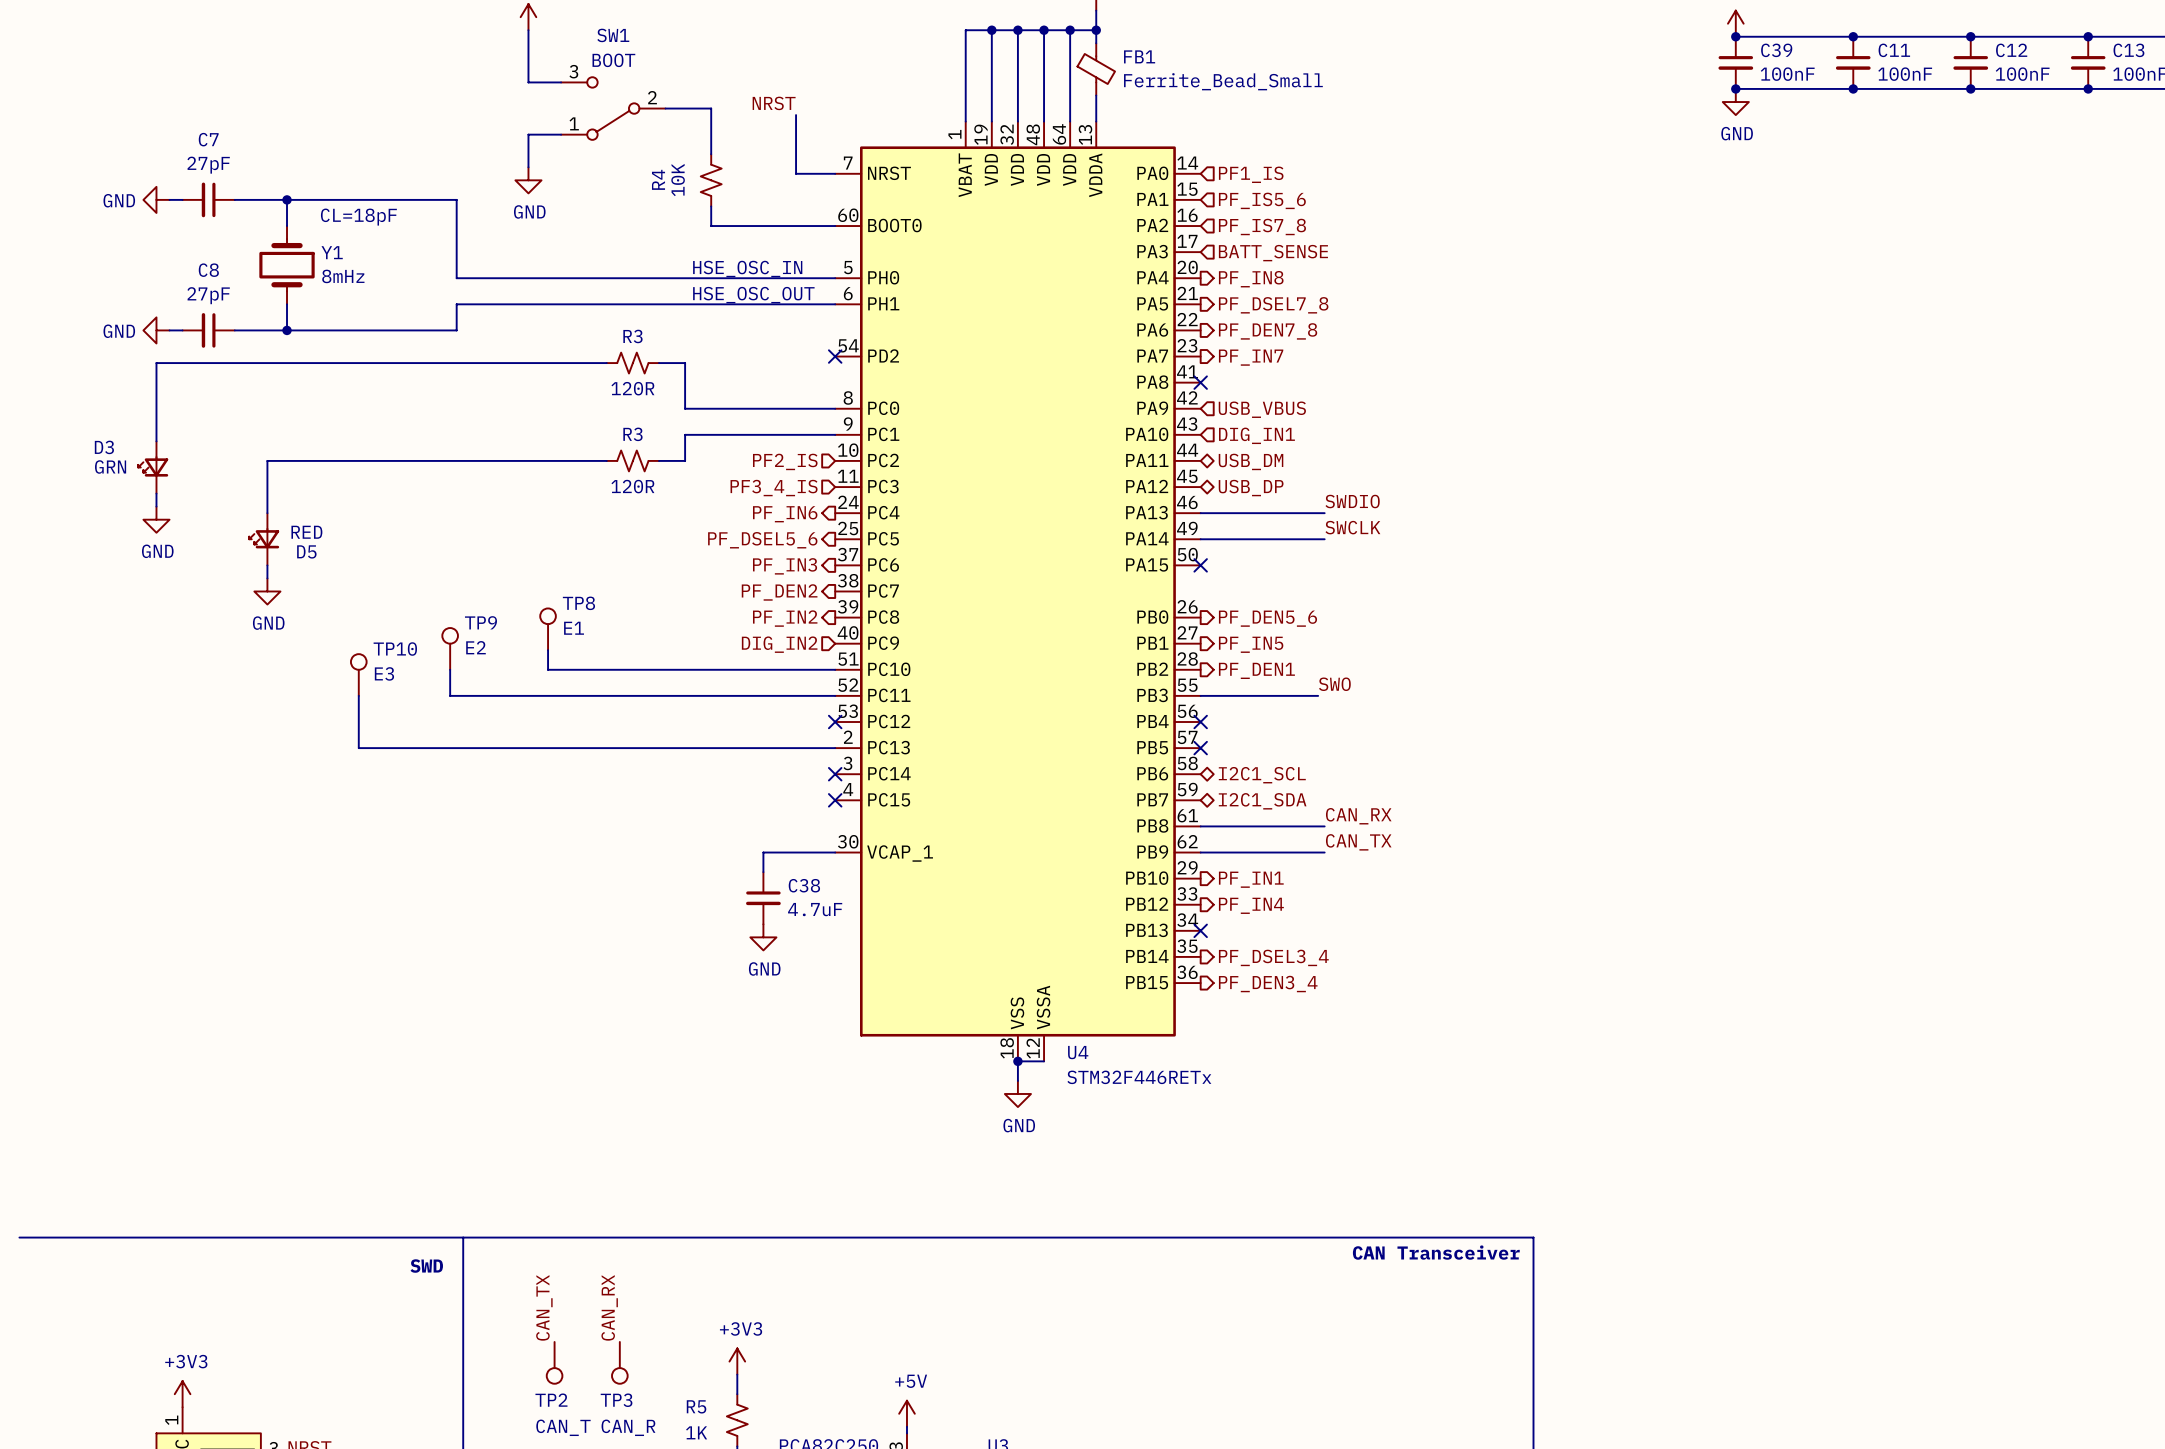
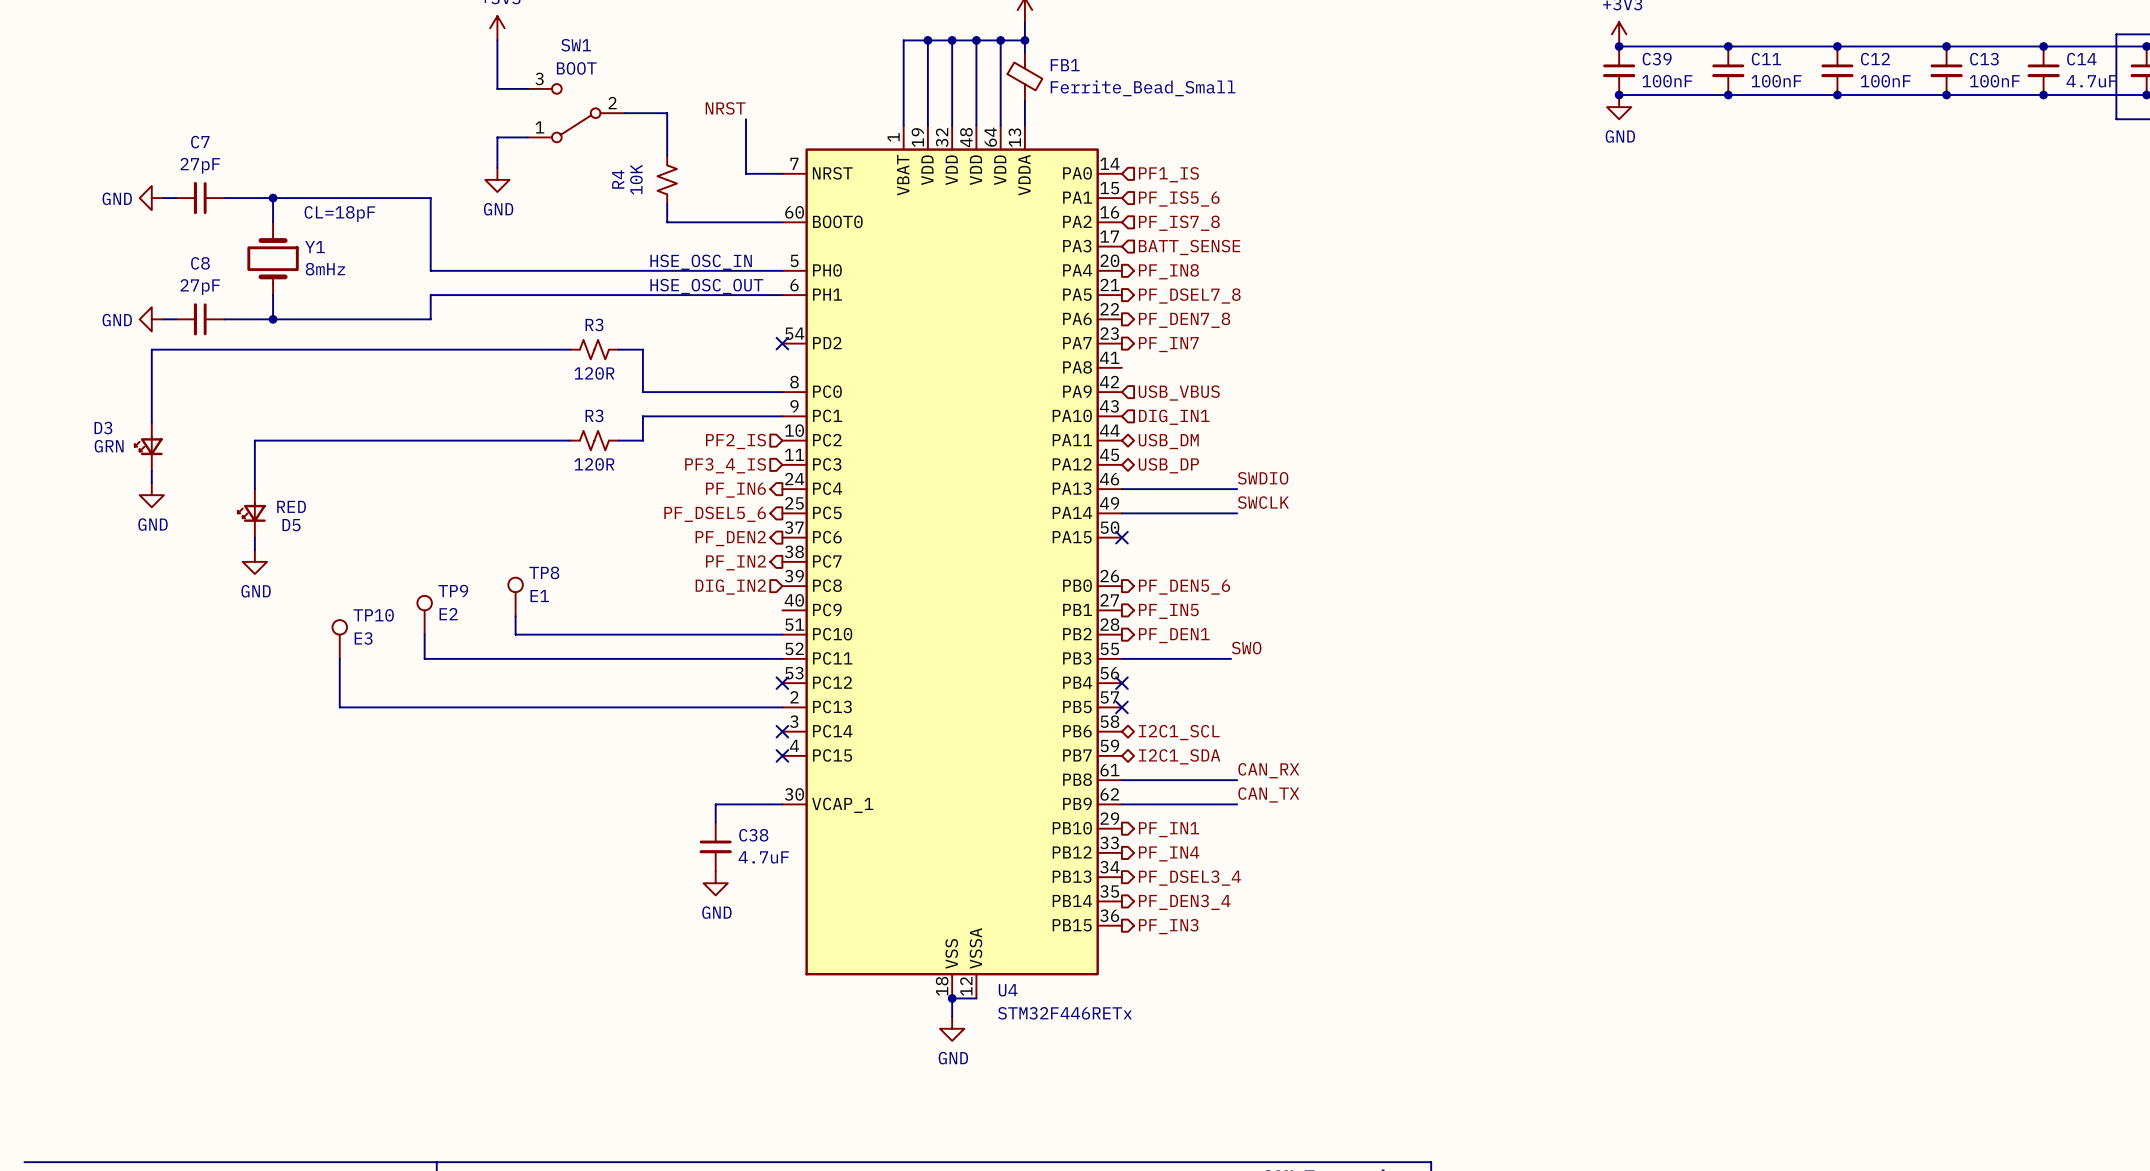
no-connect mark: (1200, 382) -> none
hierarchical label: PF_IN3 (785, 566) -> PF_DEN2 (730, 538)
hierarchical label: PF_DEN2 (779, 592) -> PF_IN2 (735, 562)
hierarchical label shape: output (785, 618) -> input (730, 587)
hierarchical label: PF_IN2 (785, 618) -> DIG_IN2 (730, 587)
hierarchical label: DIG_IN2 (779, 644) -> none
no-connect mark: (1200, 930) -> none
hierarchical label: none -> PF_DSEL3_4 (1189, 878)
hierarchical label: PF_DSEL3_4 (1273, 957) -> PF_DEN3_4 (1184, 902)
hierarchical label: PF_DEN3_4 (1268, 984) -> PF_IN3 (1168, 926)

